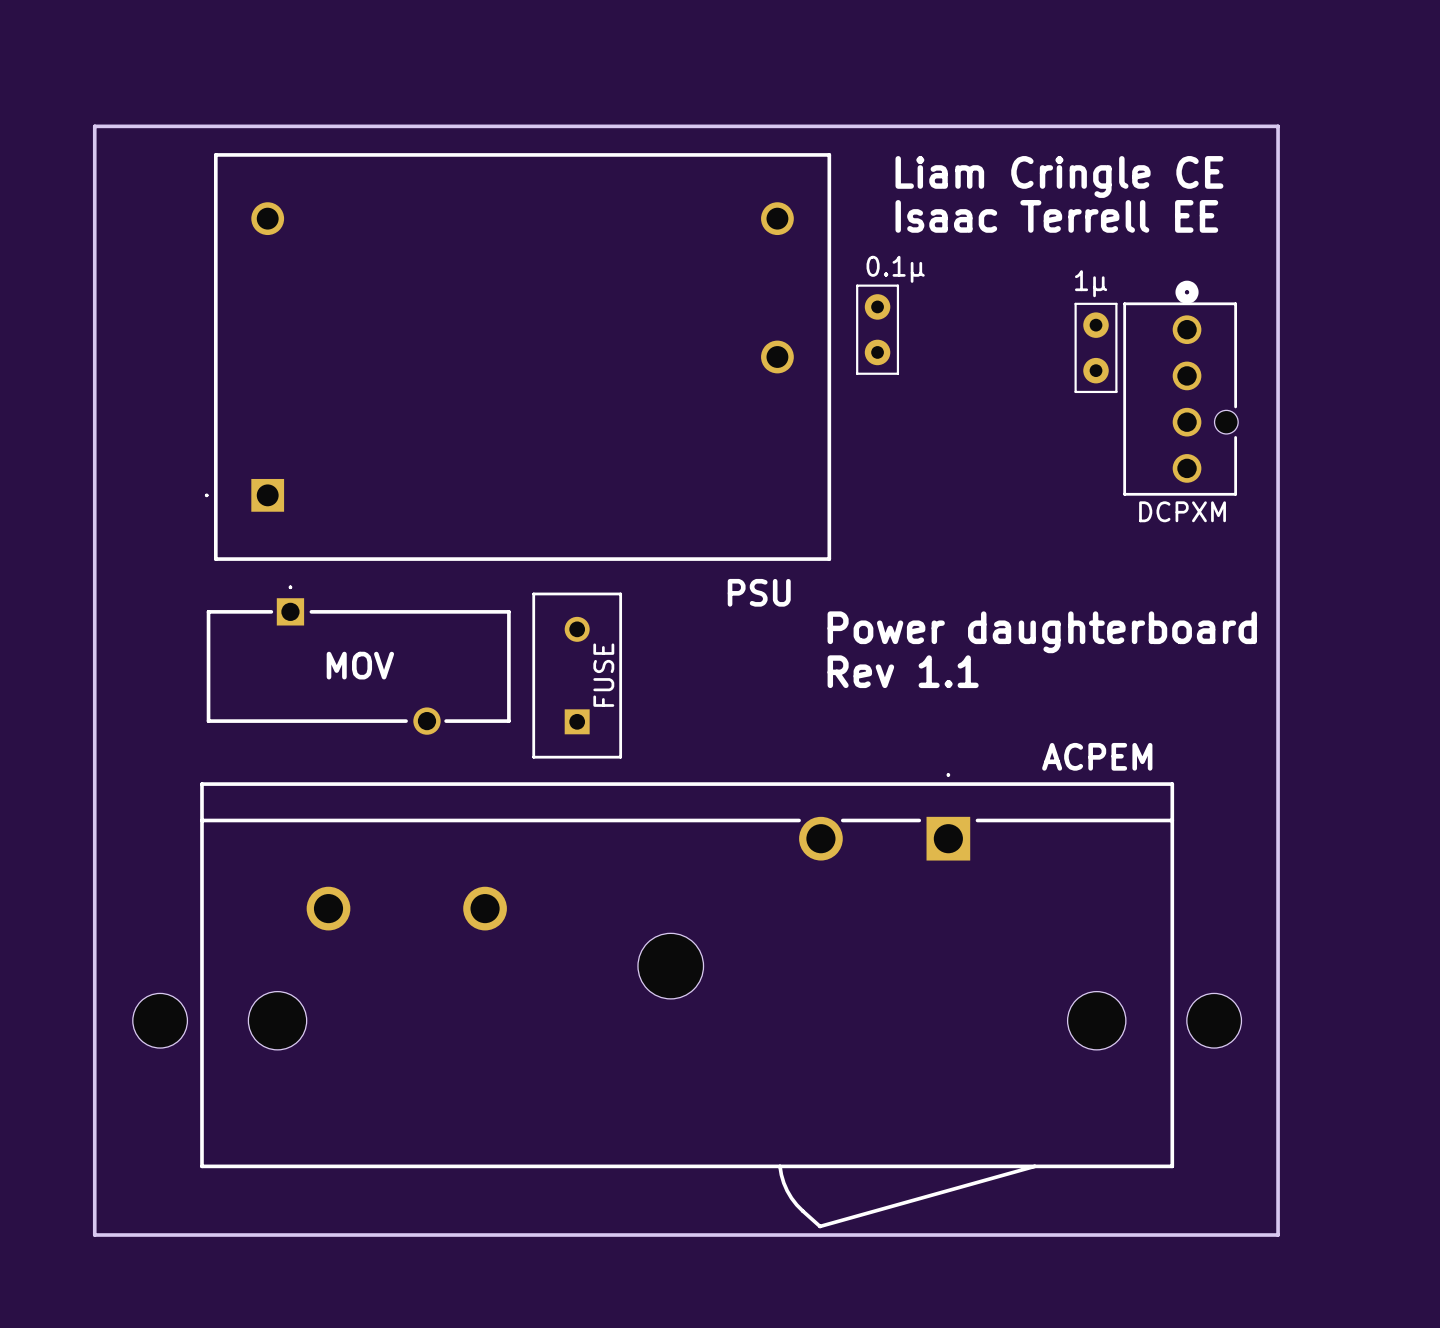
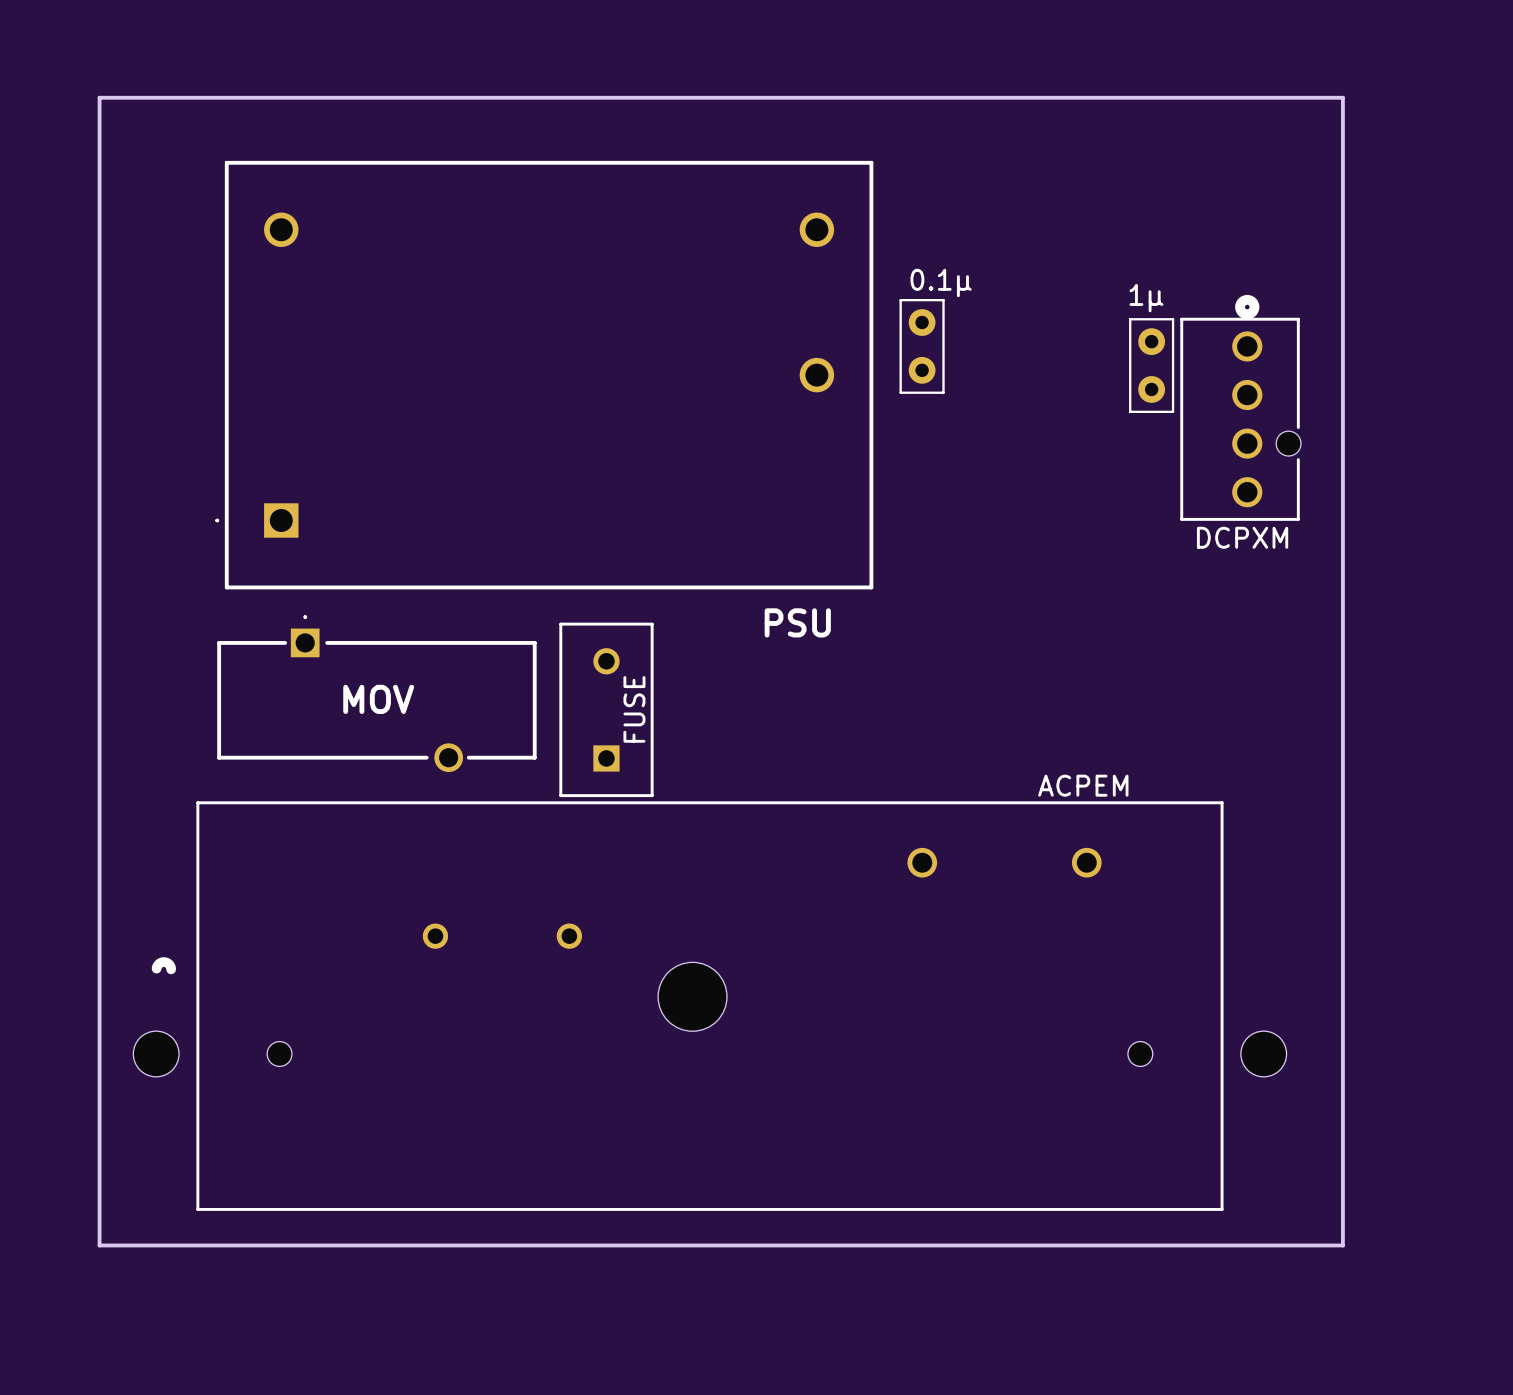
board edge: (94, 126) (1278, 126) -> (99, 132) (99, 97) (1342, 97) (1342, 132)
text: Liam Cringle CE (1059, 176) -> none
text: Isaac Terrell EE (1056, 216) -> none
text: Power daughterboard (1042, 632) -> none
text: Rev 1.1 (903, 671) -> none
ACPEM: none -> (709, 1006)
ACPEM: (687, 1000) -> none
board edge: (94, 1185) (94, 1235) (1278, 1235) (1278, 1185) -> (99, 1245) (1342, 1245)

